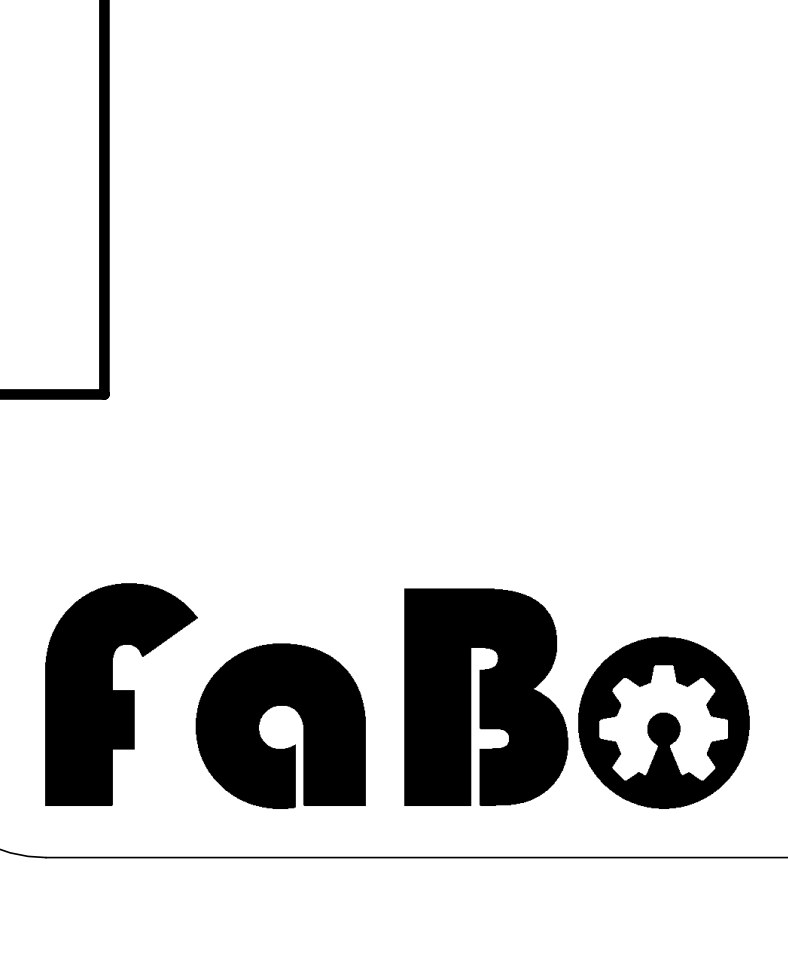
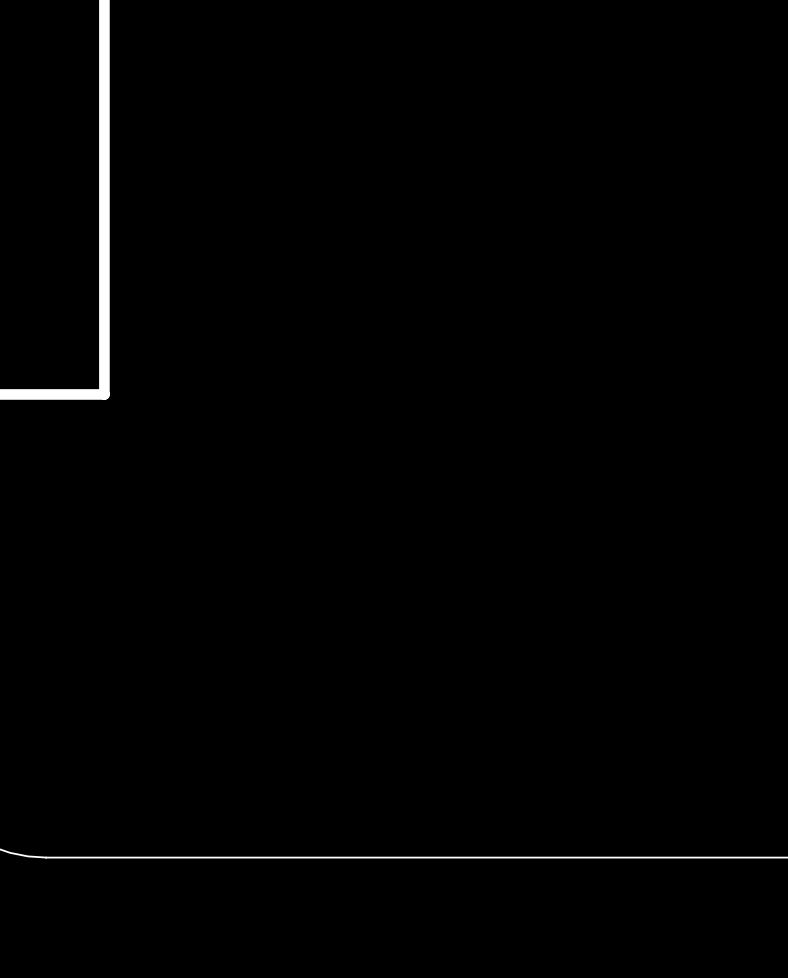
drawing: [45, 583, 750, 810] -> none

